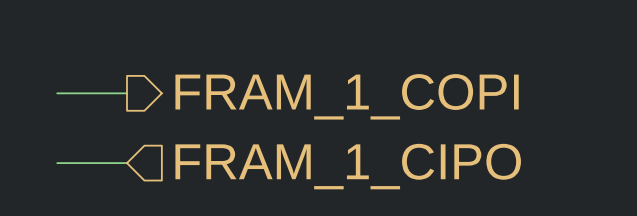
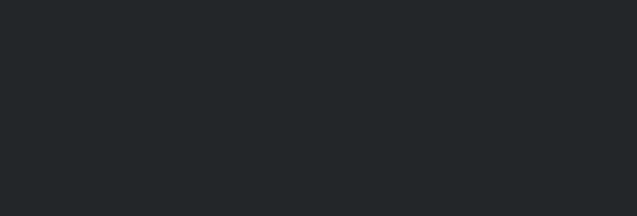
wire: (57, 93) (127, 93) -> none
hierarchical label: FRAM_1_COPI (347, 96) -> none
wire: (57, 163) (127, 163) -> none
hierarchical label: FRAM_1_CIPO (348, 166) -> none

